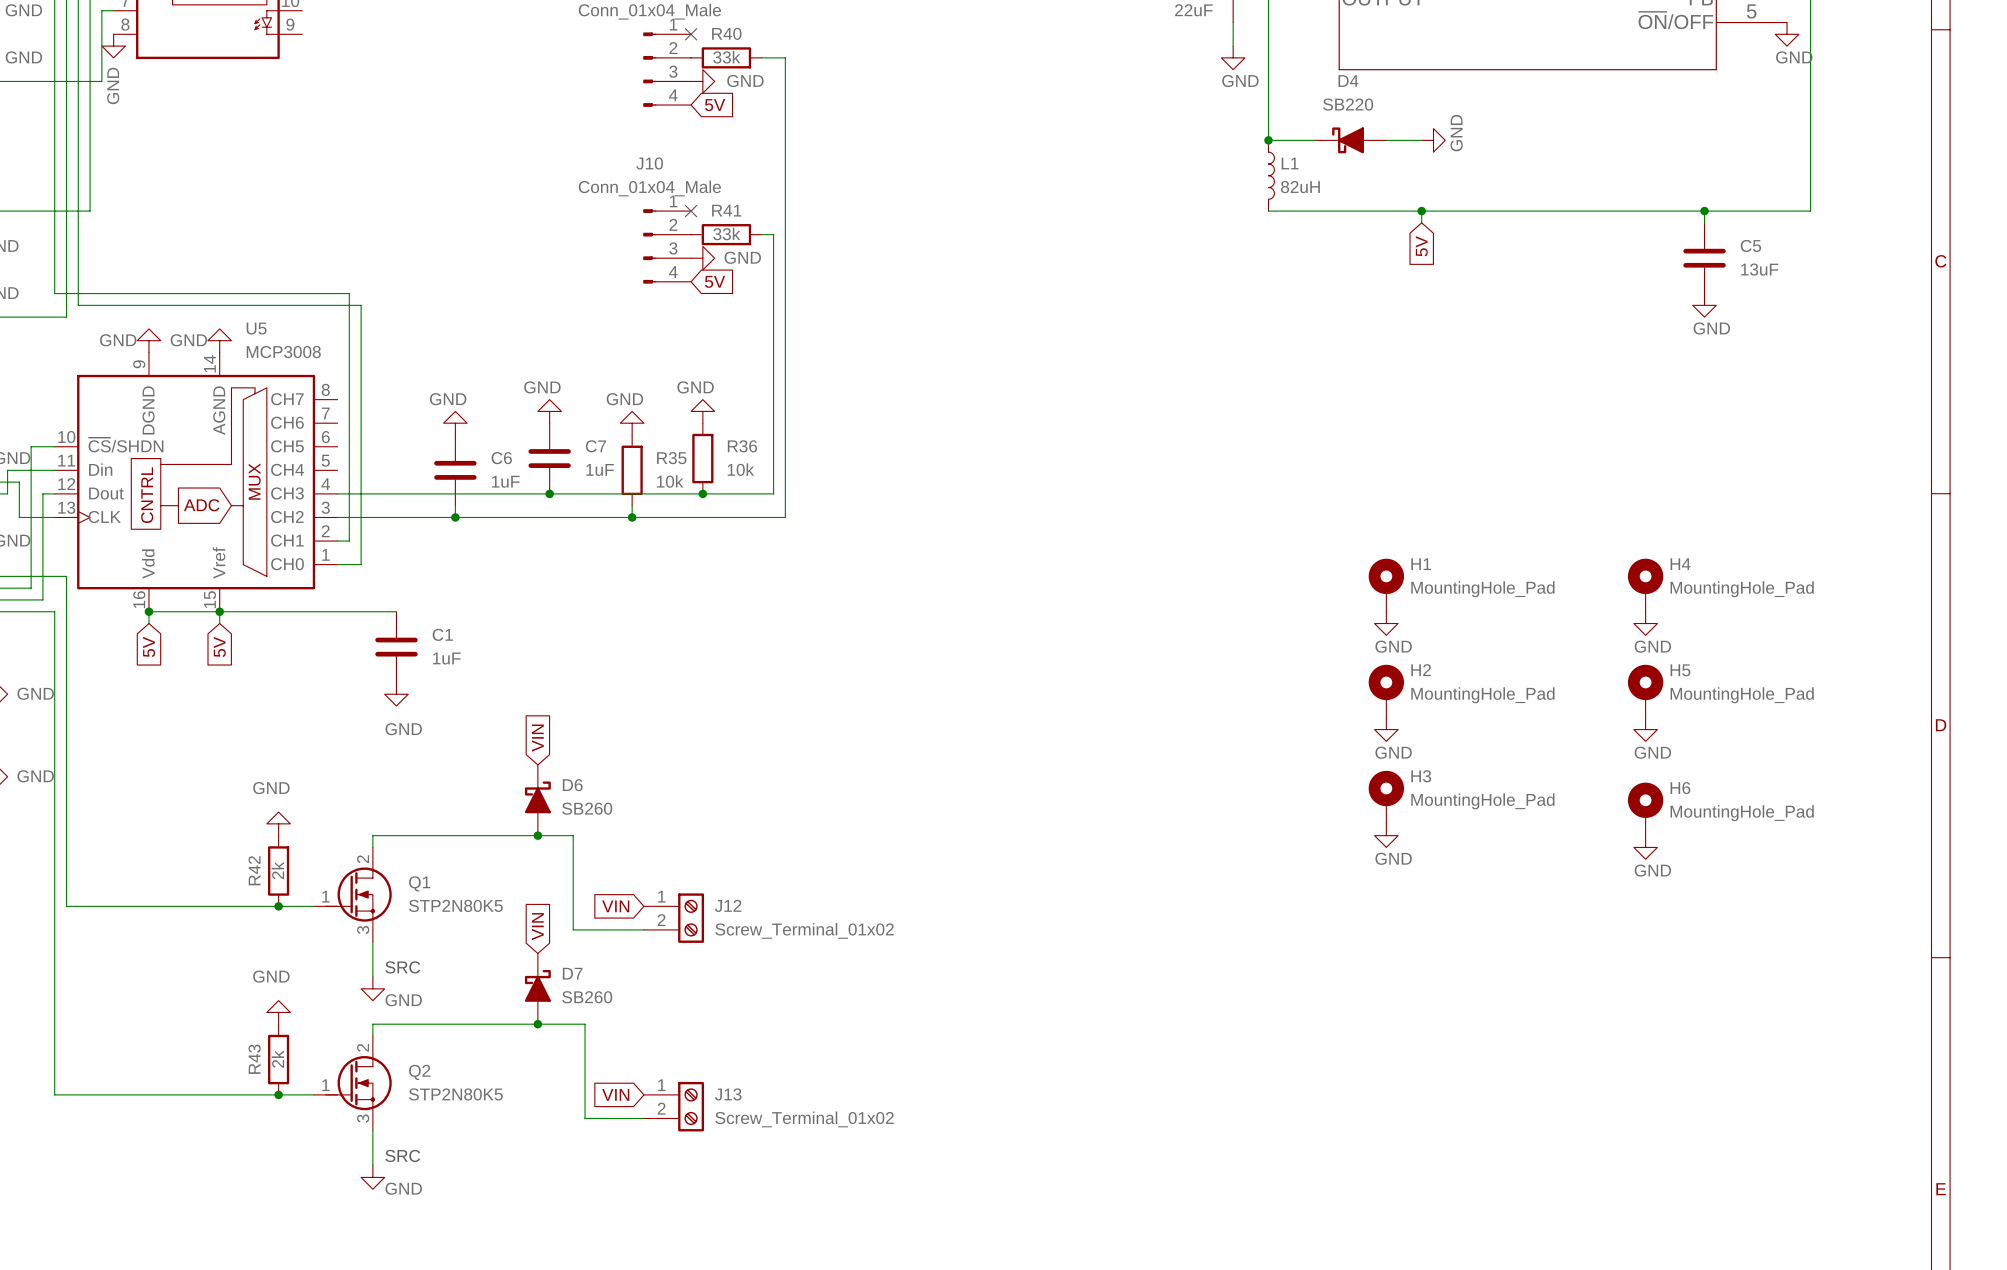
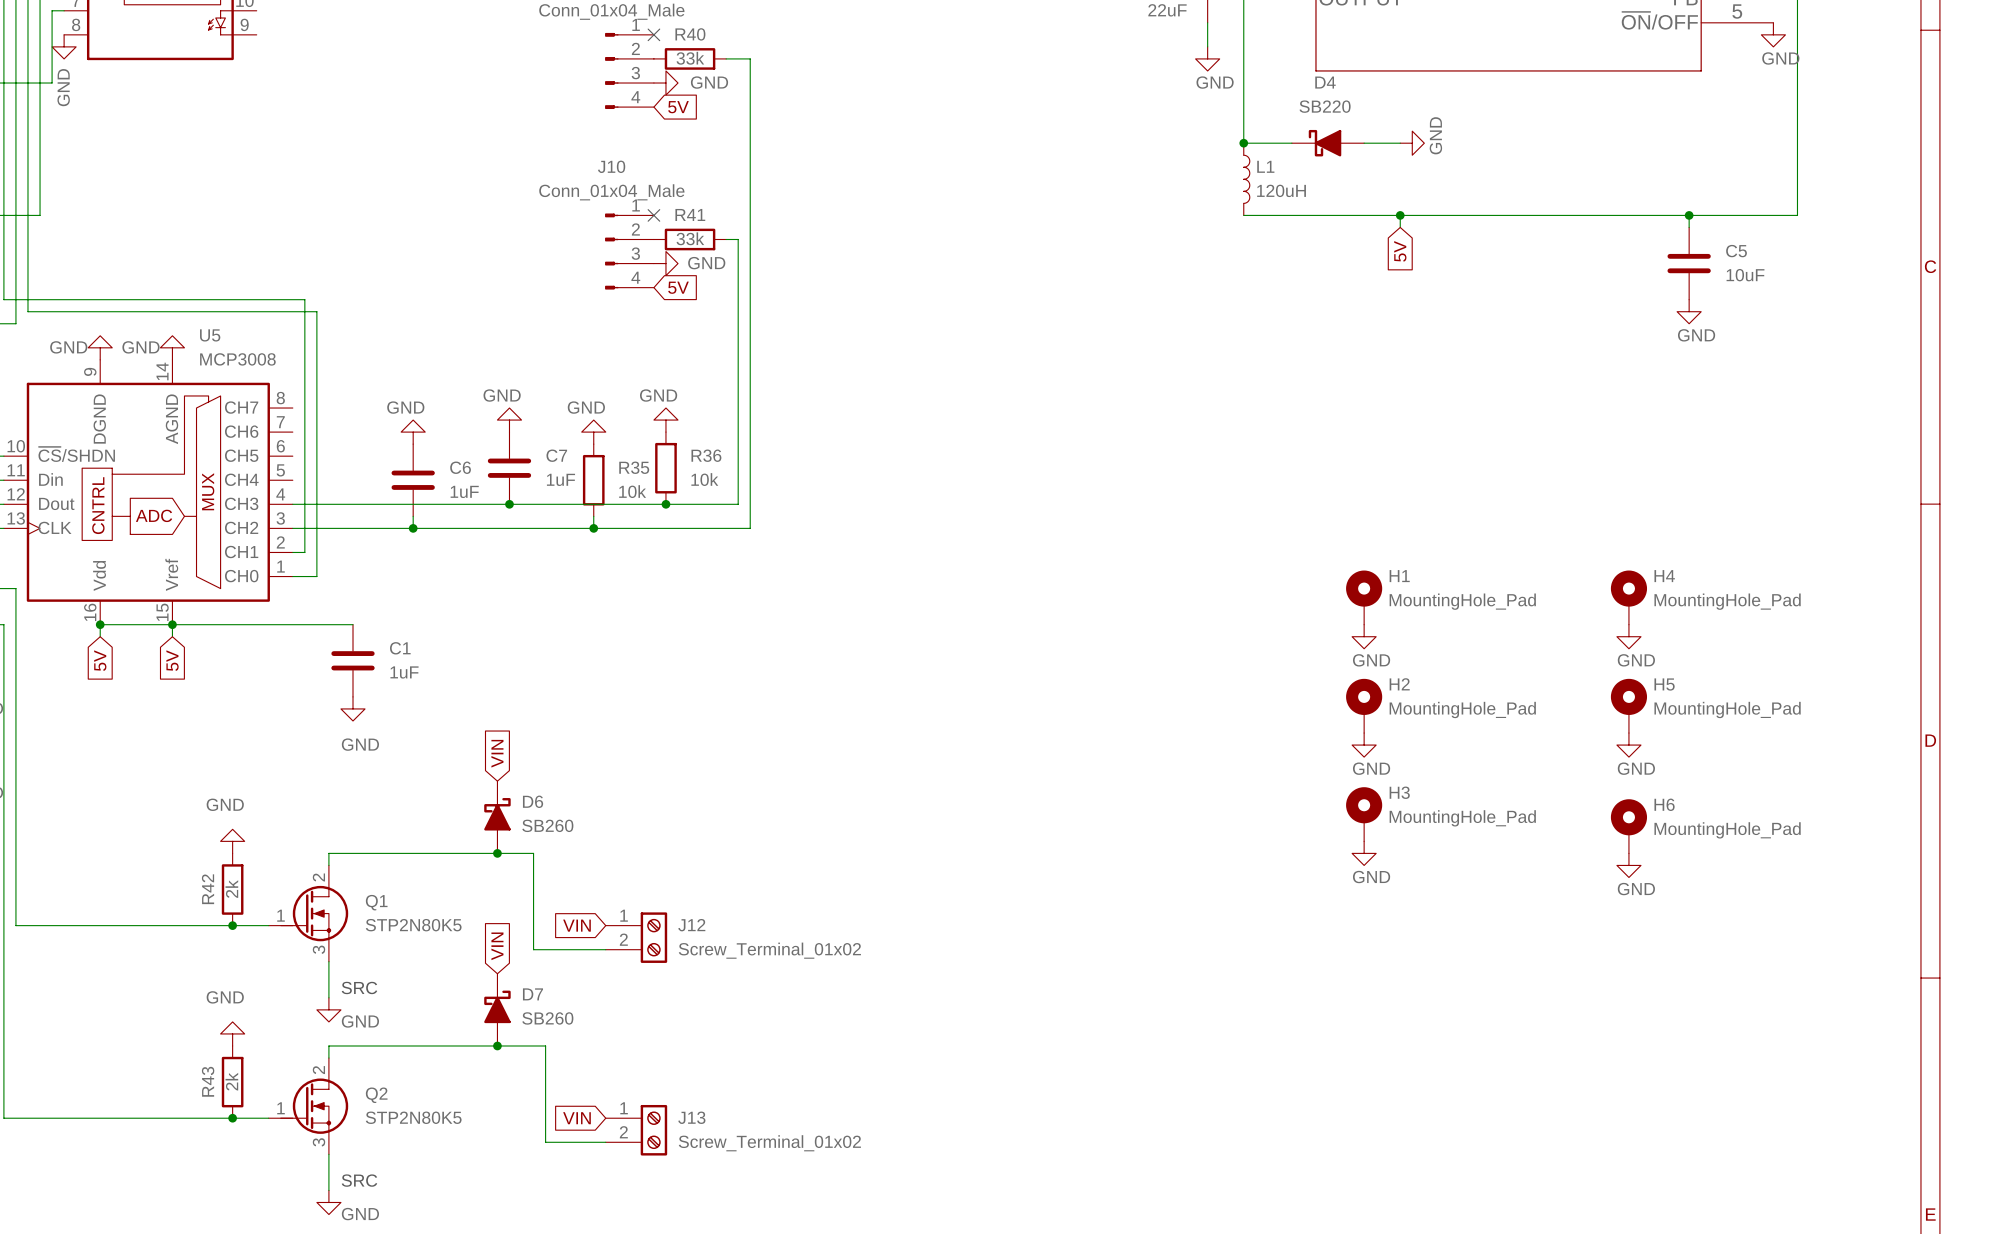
L1 value: 82uH (1300, 187) -> 120uH (1281, 190)
C5 value: 13uF (1759, 269) -> 10uF (1745, 275)

